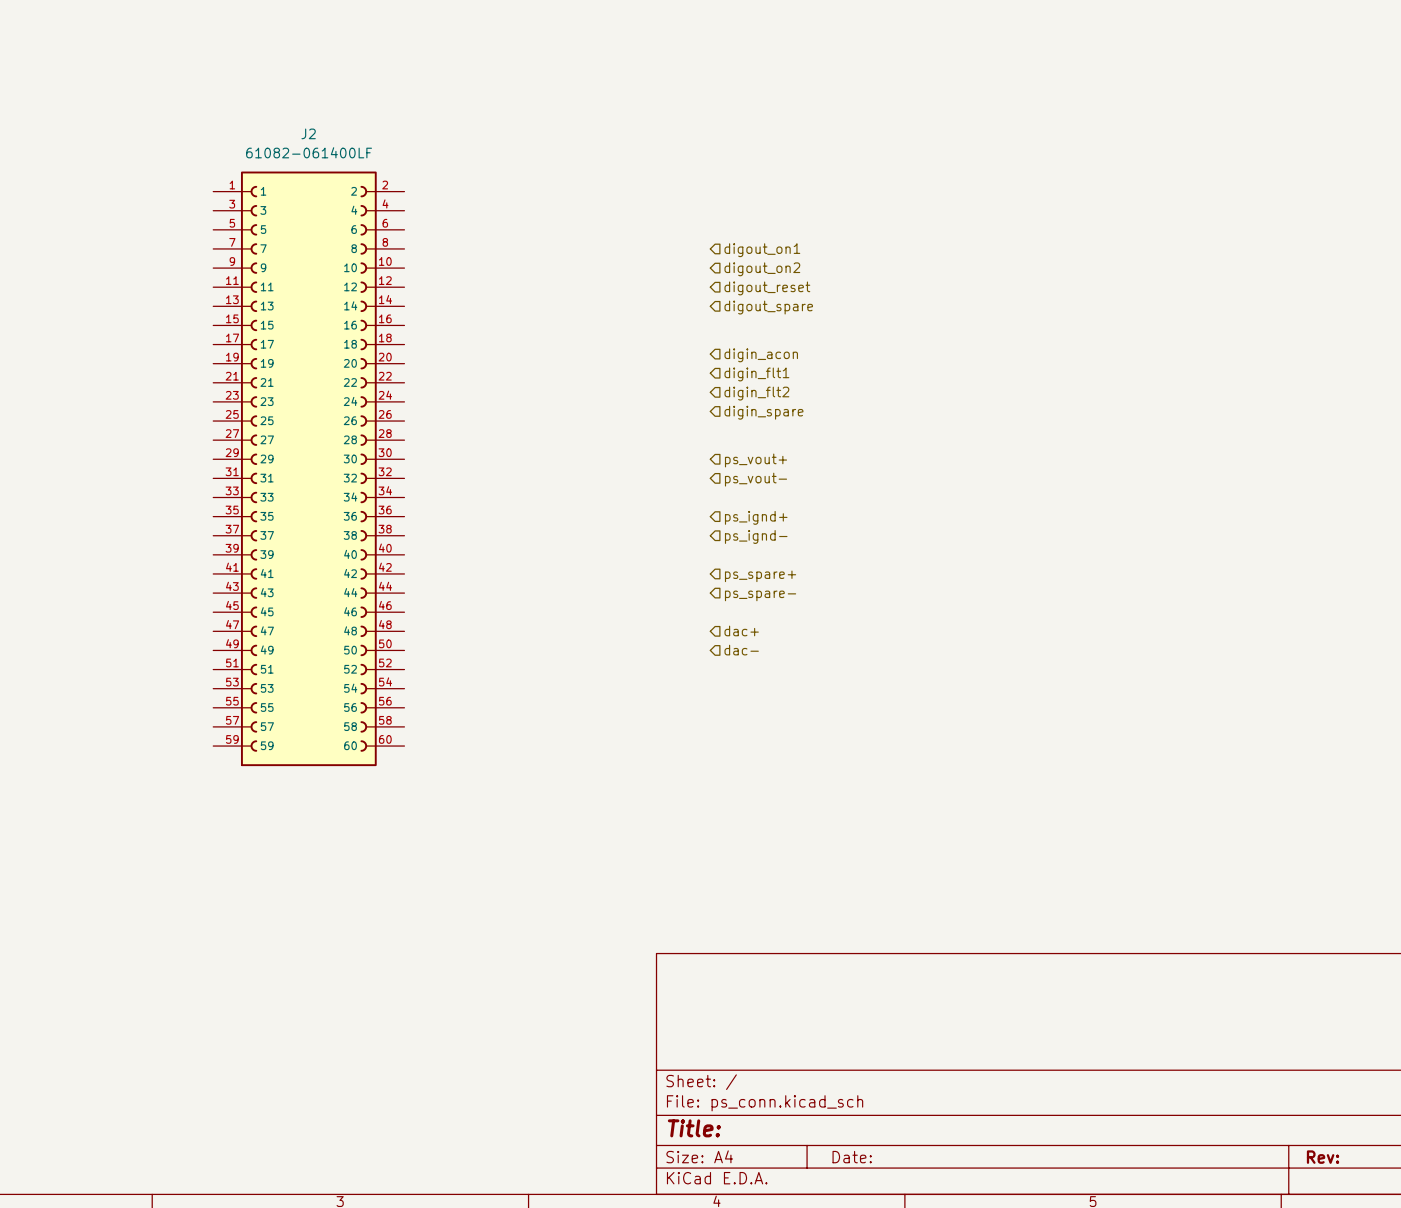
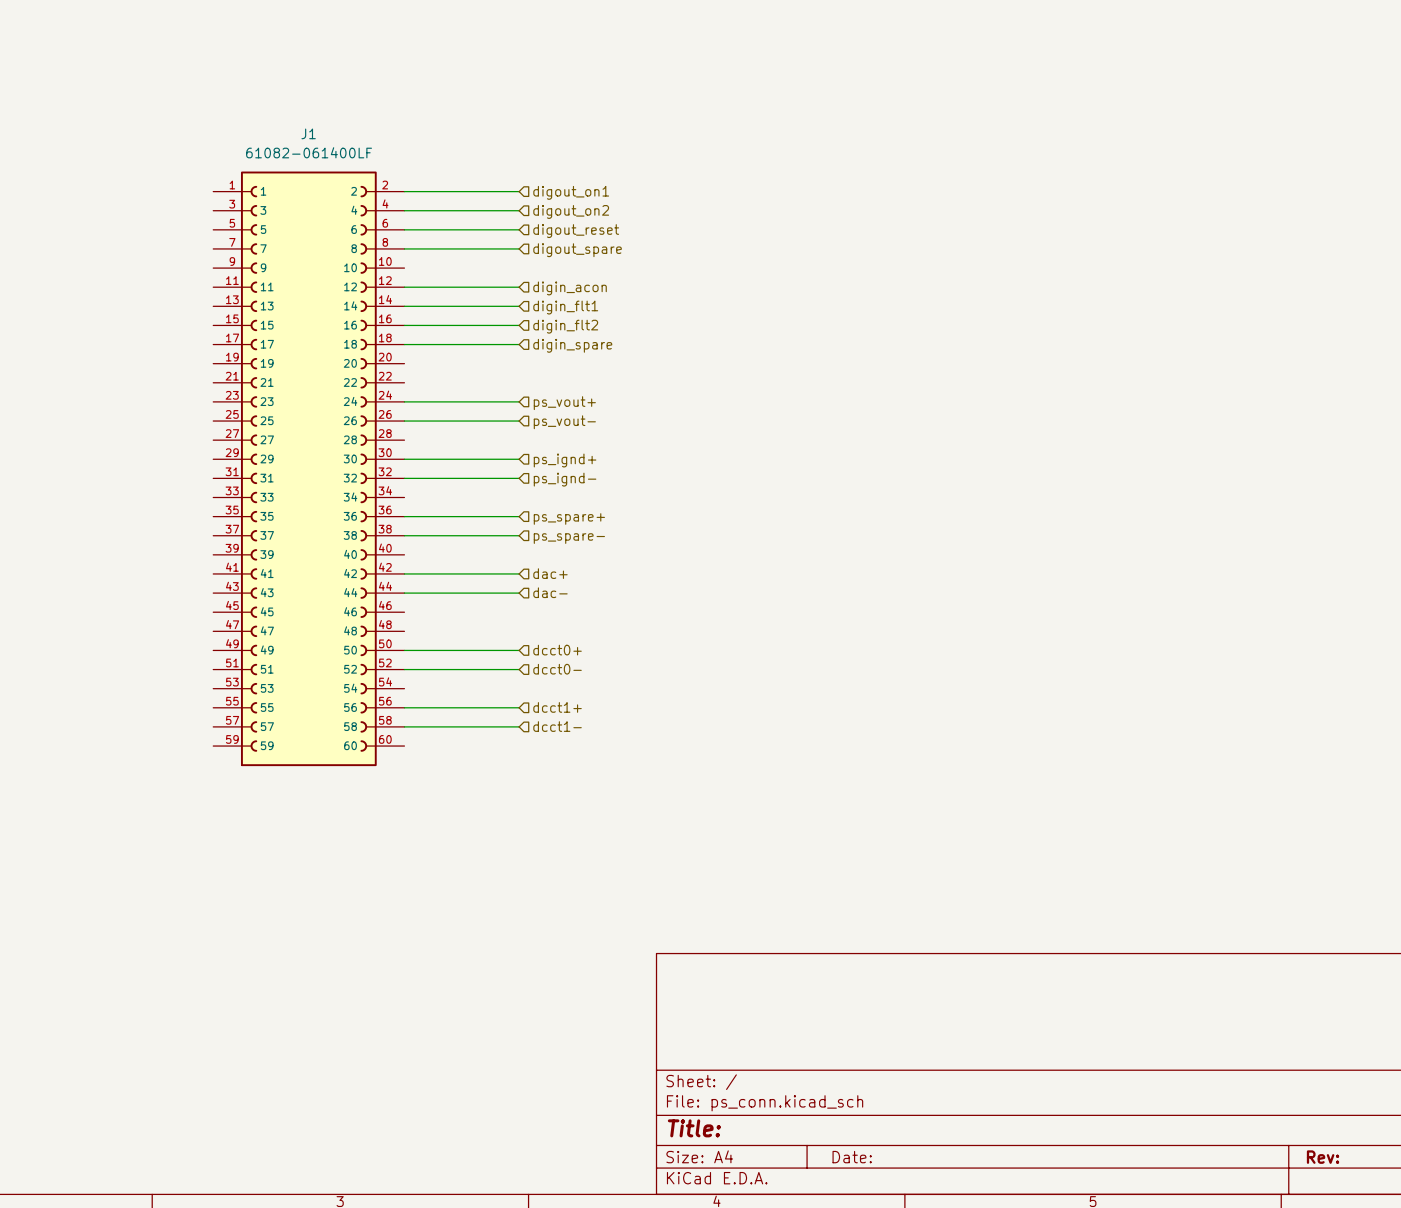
J2 name: J2 (308, 133) -> J1 (308, 133)
wire: none -> (404, 191) (519, 191)
hierarchical label: none -> digout_on1 (571, 192)
wire: none -> (404, 210) (519, 210)
hierarchical label: none -> digout_on2 (571, 211)
wire: none -> (404, 229) (519, 229)
hierarchical label: none -> digout_reset (576, 231)
wire: none -> (404, 248) (519, 248)
hierarchical label: none -> digout_spare (577, 250)
hierarchical label: digout_on1 (762, 250) -> none
hierarchical label: digout_on2 (762, 269) -> none
wire: none -> (404, 287) (519, 287)
hierarchical label: none -> digin_acon (570, 288)
hierarchical label: digout_reset (767, 288) -> none
wire: none -> (404, 306) (519, 306)
hierarchical label: none -> digin_flt1 (565, 307)
hierarchical label: digout_spare (768, 307) -> none
wire: none -> (404, 325) (519, 325)
hierarchical label: none -> digin_flt2 (565, 326)
wire: none -> (404, 344) (519, 344)
hierarchical label: none -> digin_spare (572, 345)
hierarchical label: digin_acon (761, 355) -> none
hierarchical label: digin_flt1 (756, 374) -> none
hierarchical label: digin_flt2 (756, 393) -> none
wire: none -> (404, 401) (519, 401)
hierarchical label: none -> ps_vout+ (564, 403)
hierarchical label: digin_spare (763, 412) -> none
wire: none -> (404, 421) (519, 421)
hierarchical label: none -> ps_vout- (564, 422)
wire: none -> (404, 459) (519, 459)
hierarchical label: none -> ps_ignd+ (565, 460)
hierarchical label: ps_vout+ (755, 460) -> none
wire: none -> (404, 478) (519, 478)
hierarchical label: none -> ps_ignd- (565, 479)
hierarchical label: ps_vout- (755, 479) -> none
wire: none -> (404, 516) (519, 516)
hierarchical label: ps_ignd+ (756, 517) -> none
hierarchical label: none -> ps_spare+ (569, 518)
wire: none -> (404, 535) (519, 535)
hierarchical label: ps_ignd- (756, 536) -> none
hierarchical label: none -> ps_spare- (569, 538)
wire: none -> (404, 573) (519, 573)
hierarchical label: none -> dac+ (550, 573)
hierarchical label: ps_spare+ (760, 576) -> none
hierarchical label: none -> dac- (550, 592)
wire: none -> (404, 593) (519, 593)
hierarchical label: ps_spare- (760, 595) -> none
hierarchical label: dac+ (741, 630) -> none
wire: none -> (404, 650) (519, 650)
hierarchical label: none -> dcct0+ (557, 650)
hierarchical label: dac- (741, 650) -> none
wire: none -> (404, 669) (519, 669)
hierarchical label: none -> dcct0- (557, 669)
wire: none -> (404, 707) (519, 707)
hierarchical label: none -> dcct1+ (557, 707)
wire: none -> (404, 726) (519, 726)
hierarchical label: none -> dcct1- (557, 726)

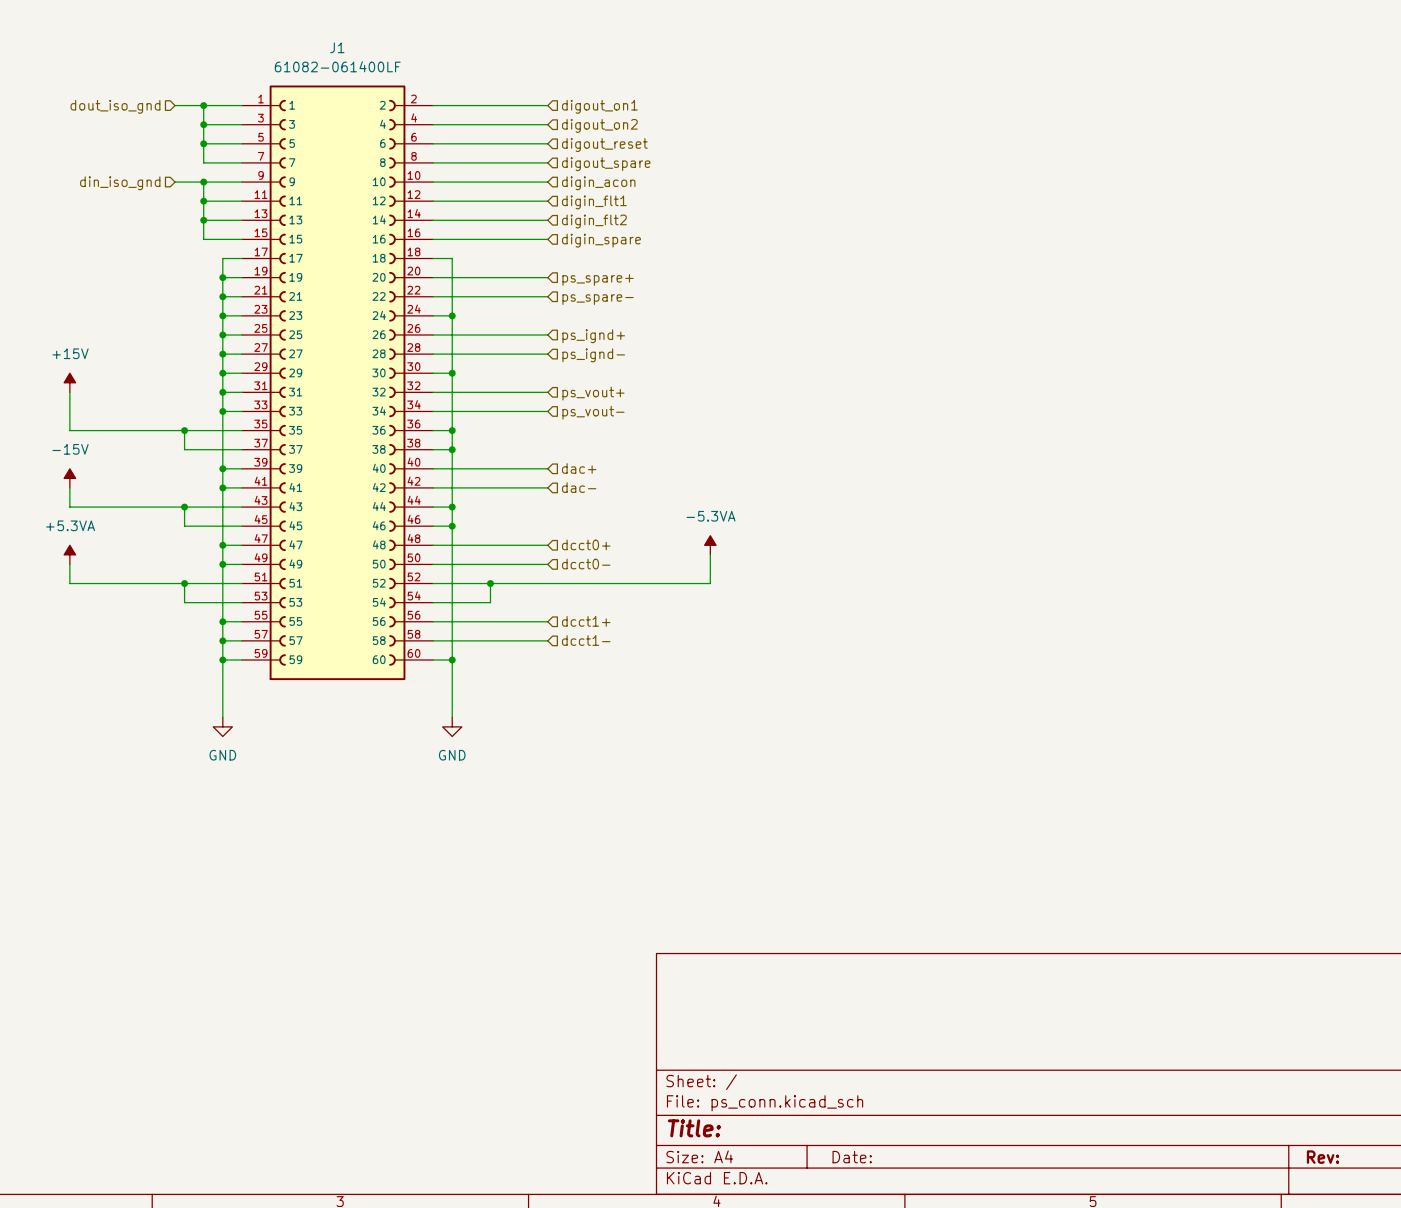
wire: none -> (175, 105) (241, 105)
wire: none -> (203, 105) (203, 162) (241, 162)
junction: none -> (203, 105)
hierarchical label: none -> dout_iso_gnd (115, 106)
wire: none -> (203, 124) (241, 124)
junction: none -> (203, 124)
wire: none -> (203, 143) (241, 143)
junction: none -> (203, 143)
wire: none -> (175, 182) (241, 182)
wire: none -> (203, 182) (203, 239) (241, 239)
junction: none -> (203, 182)
hierarchical label: none -> din_iso_gnd (120, 183)
wire: (404, 191) (519, 191) -> (433, 162) (547, 162)
hierarchical label position: digout_on1 (571, 192) -> digout_on1 (599, 106)
wire: none -> (203, 201) (241, 201)
junction: none -> (203, 201)
wire: (404, 210) (519, 210) -> (433, 105) (547, 105)
hierarchical label position: digout_on2 (571, 211) -> digout_on2 (599, 125)
wire: none -> (203, 220) (241, 220)
junction: none -> (203, 220)
wire: (404, 229) (519, 229) -> (433, 124) (547, 124)
hierarchical label position: digout_reset (576, 231) -> digout_reset (604, 145)
wire: (404, 248) (519, 248) -> (433, 143) (547, 143)
hierarchical label position: digout_spare (577, 250) -> digout_spare (606, 164)
wire: none -> (241, 258) (222, 258) (222, 717)
wire: none -> (433, 258) (452, 258) (452, 717)
wire: none -> (222, 277) (241, 277)
junction: none -> (222, 277)
wire: none -> (433, 277) (547, 277)
hierarchical label: none -> ps_spare+ (598, 280)
wire: (404, 287) (519, 287) -> (433, 182) (547, 182)
hierarchical label position: digin_acon (570, 288) -> digin_acon (598, 183)
wire: none -> (222, 296) (241, 296)
junction: none -> (222, 296)
hierarchical label: none -> ps_spare- (598, 299)
wire: (404, 306) (519, 306) -> (433, 201) (547, 201)
hierarchical label position: digin_flt1 (565, 307) -> digin_flt1 (594, 202)
wire: none -> (222, 315) (241, 315)
junction: none -> (222, 315)
wire: none -> (433, 315) (452, 315)
junction: none -> (452, 315)
wire: (404, 325) (519, 325) -> (433, 220) (547, 220)
hierarchical label position: digin_flt2 (565, 326) -> digin_flt2 (594, 221)
wire: none -> (222, 334) (241, 334)
junction: none -> (222, 334)
wire: (404, 344) (519, 344) -> (433, 239) (547, 239)
hierarchical label position: digin_spare (572, 345) -> digin_spare (601, 240)
wire: none -> (222, 354) (241, 354)
junction: none -> (222, 354)
wire: none -> (222, 373) (241, 373)
junction: none -> (222, 373)
wire: none -> (433, 373) (452, 373)
junction: none -> (452, 373)
power symbol: none -> +15V (69, 382)
wire: none -> (69, 392) (69, 430) (241, 430)
wire: none -> (222, 392) (241, 392)
junction: none -> (222, 392)
wire: (404, 401) (519, 401) -> (433, 296) (547, 296)
hierarchical label position: ps_vout+ (564, 403) -> ps_vout+ (593, 393)
wire: none -> (222, 411) (241, 411)
junction: none -> (222, 411)
wire: (404, 421) (519, 421) -> (433, 334) (547, 334)
hierarchical label position: ps_vout- (564, 422) -> ps_vout- (593, 412)
wire: none -> (184, 430) (184, 449) (241, 449)
junction: none -> (184, 430)
wire: none -> (433, 430) (452, 430)
junction: none -> (452, 430)
wire: none -> (433, 449) (452, 449)
junction: none -> (452, 449)
wire: (404, 459) (519, 459) -> (433, 354) (547, 354)
hierarchical label position: ps_ignd+ (565, 460) -> ps_ignd+ (593, 336)
wire: none -> (222, 468) (241, 468)
junction: none -> (222, 468)
J1 position: (308, 468) -> (337, 382)
power symbol: none -> -15V (69, 478)
wire: (404, 478) (519, 478) -> (433, 392) (547, 392)
hierarchical label position: ps_ignd- (565, 479) -> ps_ignd- (593, 355)
wire: none -> (69, 487) (69, 507) (241, 507)
wire: none -> (222, 487) (241, 487)
junction: none -> (222, 487)
wire: none -> (184, 507) (184, 526) (241, 526)
junction: none -> (184, 507)
wire: none -> (433, 507) (452, 507)
junction: none -> (452, 507)
wire: (404, 516) (519, 516) -> (433, 411) (547, 411)
hierarchical label: ps_spare+ (569, 518) -> none
wire: none -> (433, 526) (452, 526)
junction: none -> (452, 526)
wire: (404, 535) (519, 535) -> none
hierarchical label: ps_spare- (569, 538) -> none
wire: none -> (222, 545) (241, 545)
junction: none -> (222, 545)
power symbol: none -> -5.3VA (710, 545)
power symbol: none -> +5.3VA (69, 554)
wire: none -> (710, 554) (710, 583) (433, 583)
wire: none -> (69, 564) (69, 583) (241, 583)
wire: none -> (222, 564) (241, 564)
junction: none -> (222, 564)
wire: (404, 573) (519, 573) -> (433, 468) (547, 468)
hierarchical label position: dac+ (550, 573) -> dac+ (579, 468)
wire: none -> (184, 583) (184, 602) (241, 602)
junction: none -> (184, 583)
wire: none -> (490, 583) (490, 602) (433, 602)
junction: none -> (490, 583)
hierarchical label position: dac- (550, 592) -> dac- (579, 487)
wire: (404, 593) (519, 593) -> (433, 487) (547, 487)
wire: none -> (222, 621) (241, 621)
junction: none -> (222, 621)
wire: none -> (222, 640) (241, 640)
junction: none -> (222, 640)
wire: (404, 650) (519, 650) -> (433, 545) (547, 545)
hierarchical label position: dcct0+ (557, 650) -> dcct0+ (586, 544)
wire: none -> (222, 660) (241, 660)
junction: none -> (222, 660)
wire: none -> (433, 660) (452, 660)
junction: none -> (452, 660)
wire: (404, 669) (519, 669) -> (433, 564) (547, 564)
hierarchical label position: dcct0- (557, 669) -> dcct0- (586, 564)
wire: (404, 707) (519, 707) -> (433, 640) (547, 640)
hierarchical label position: dcct1+ (557, 707) -> dcct1+ (586, 621)
power symbol: none -> GND (222, 726)
wire: (404, 726) (519, 726) -> (433, 621) (547, 621)
power symbol: none -> GND (452, 726)
hierarchical label position: dcct1- (557, 726) -> dcct1- (586, 640)

